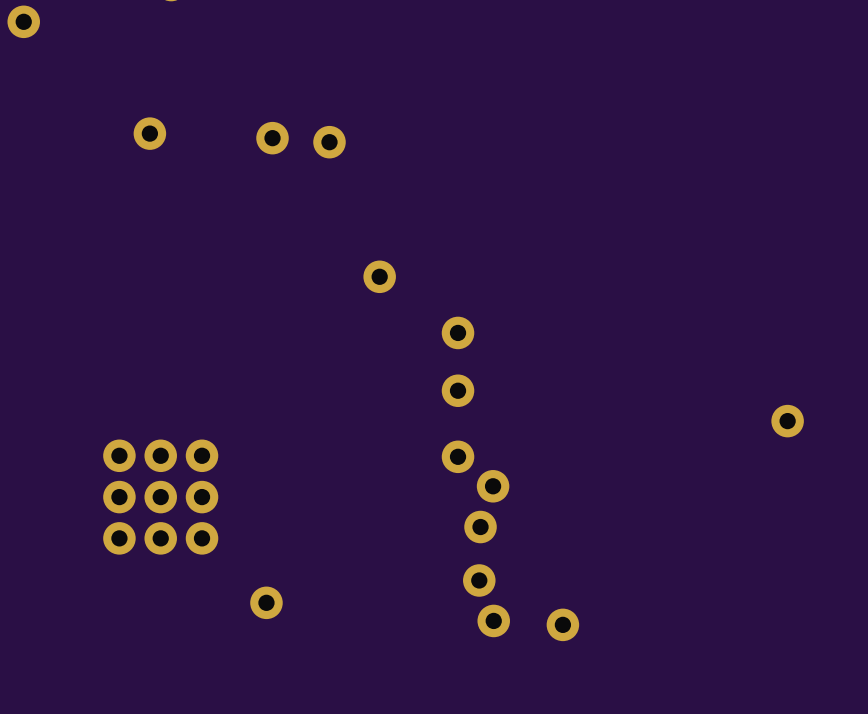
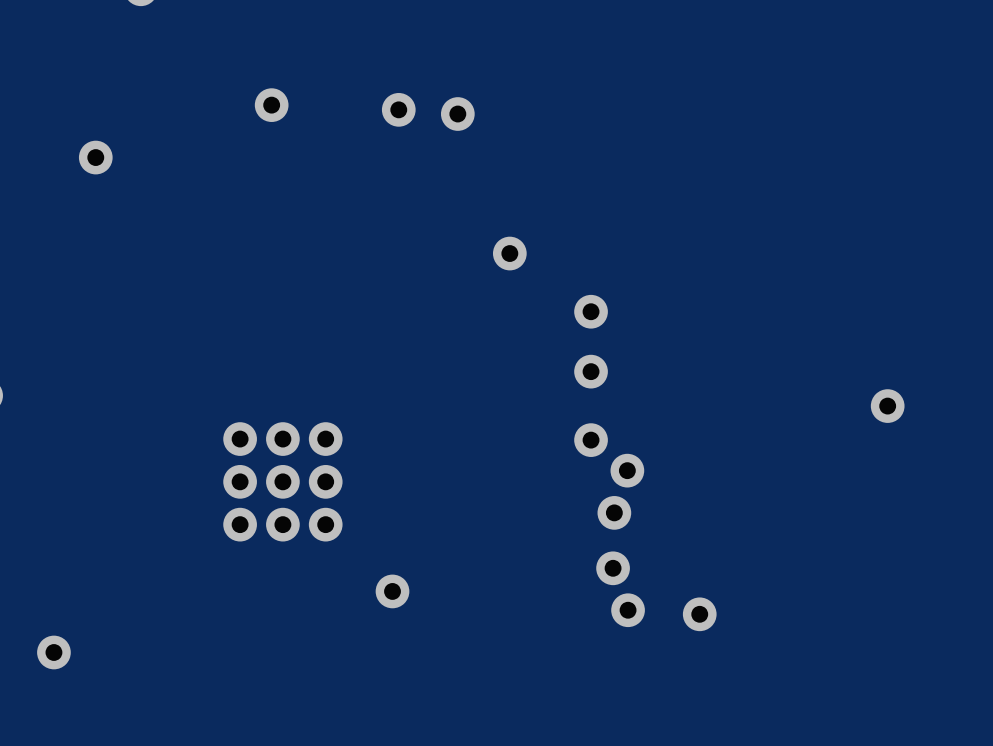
via position: (787, 421) -> (887, 406)

